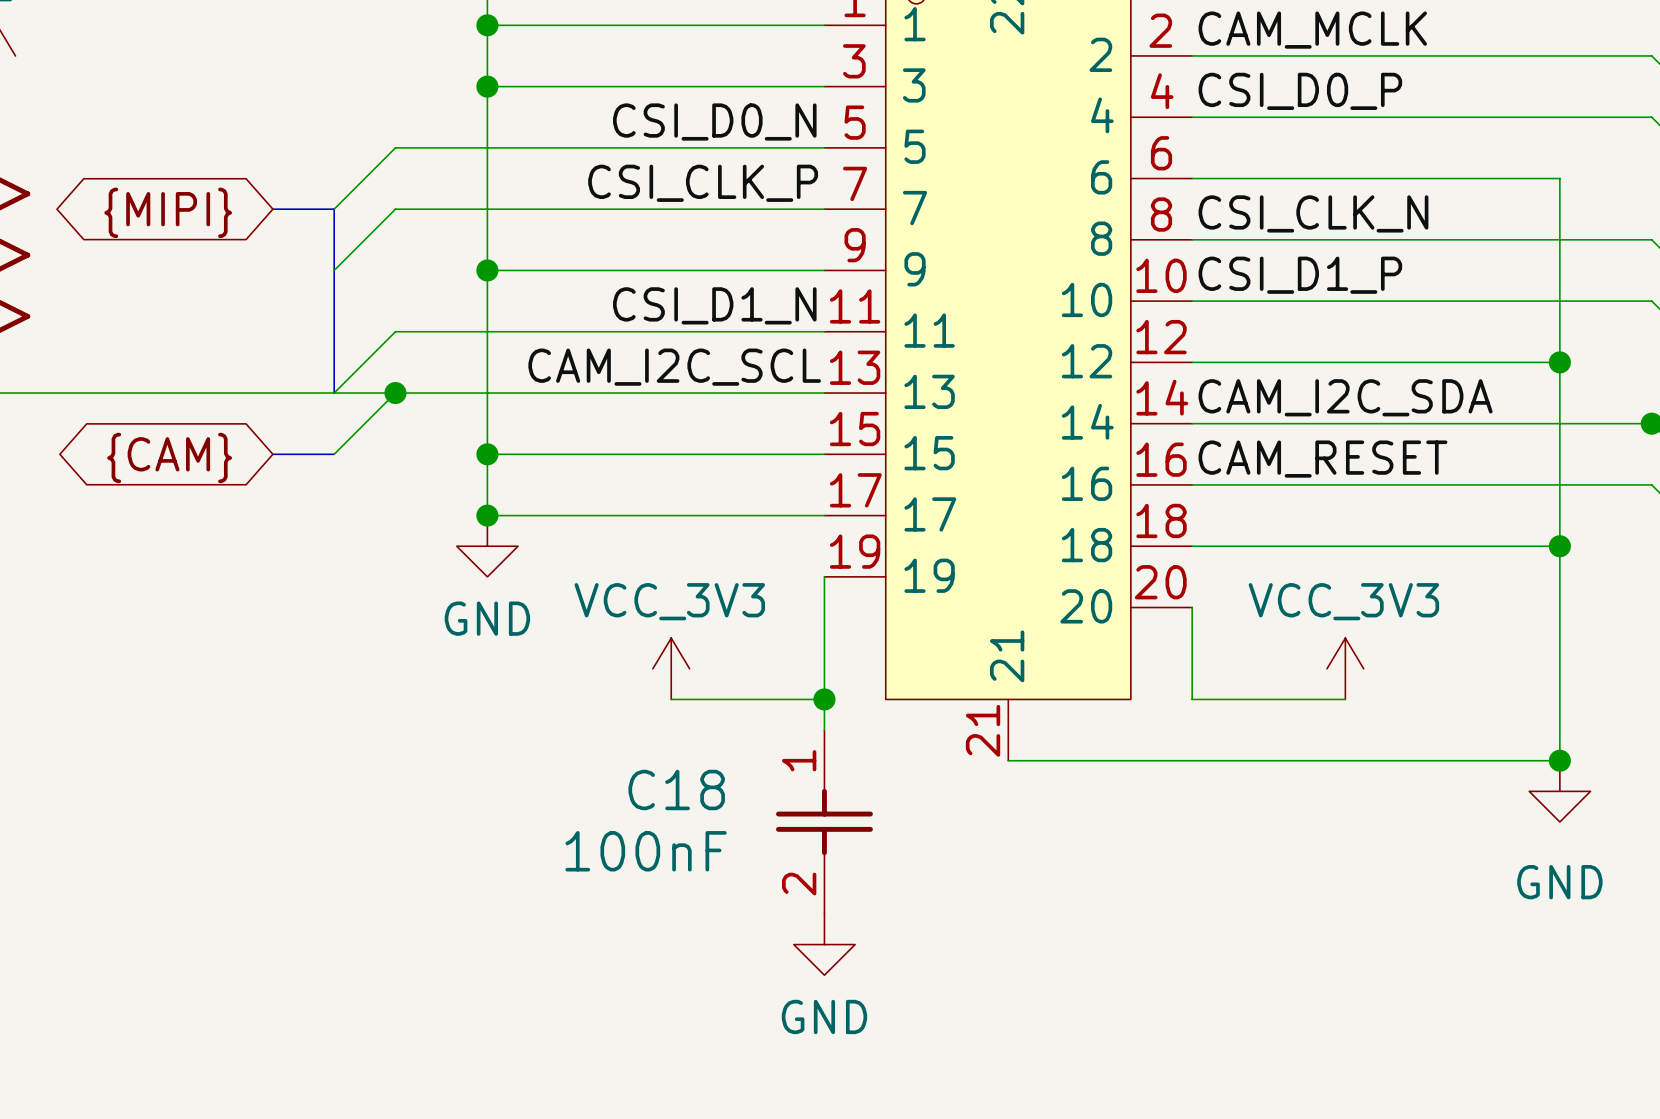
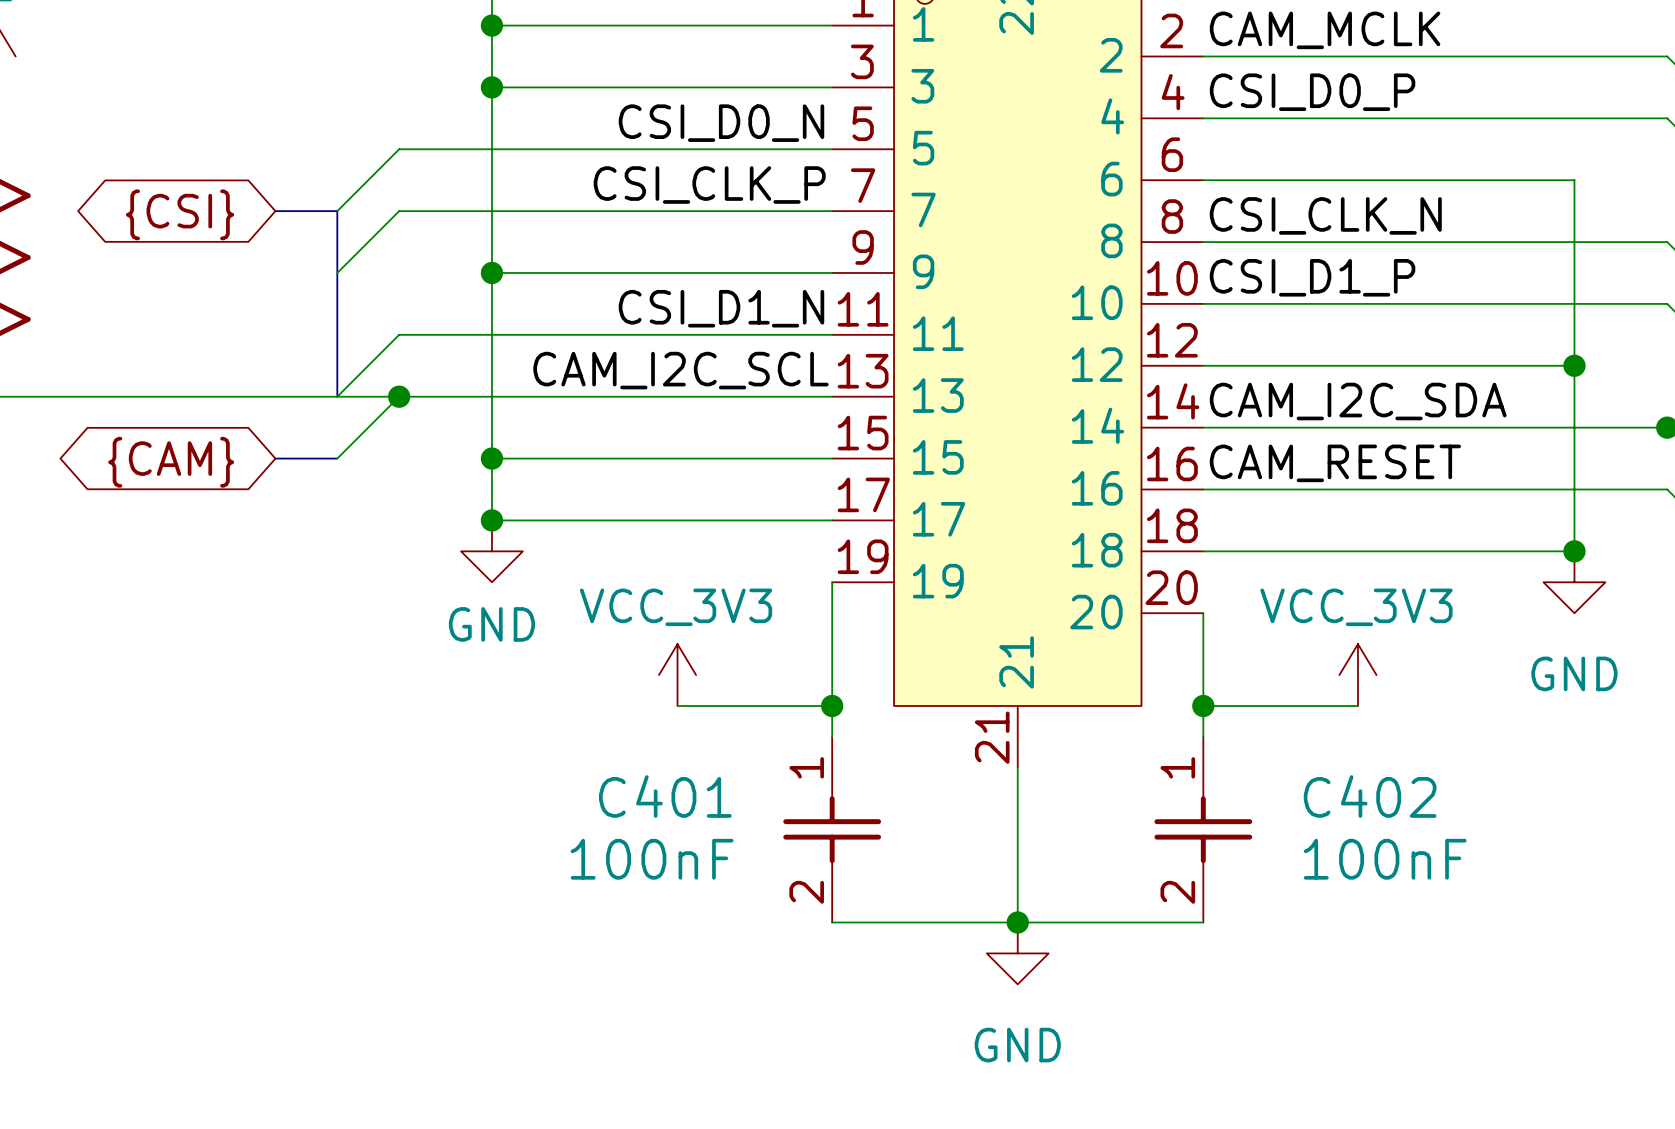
global label: {MIPI} (168, 212) -> {CSI} (180, 214)
wire: (1559, 546) (1559, 760) (1008, 760) -> (1017, 922) (1017, 767)
wire: none -> (1203, 705) (1203, 736)
junction: none -> (1203, 705)
junction: (1559, 760) -> none
C18 name: C18 (676, 789) -> C401 (665, 796)
power symbol position: GND (1559, 791) -> GND (1574, 582)
C402: none -> 100nF (1203, 829)
wire: none -> (832, 922) (1203, 922)
junction: none -> (1017, 922)
power symbol position: GND (824, 944) -> GND (1017, 953)
power symbol text position: GND (824, 1016) -> GND (1017, 1045)

